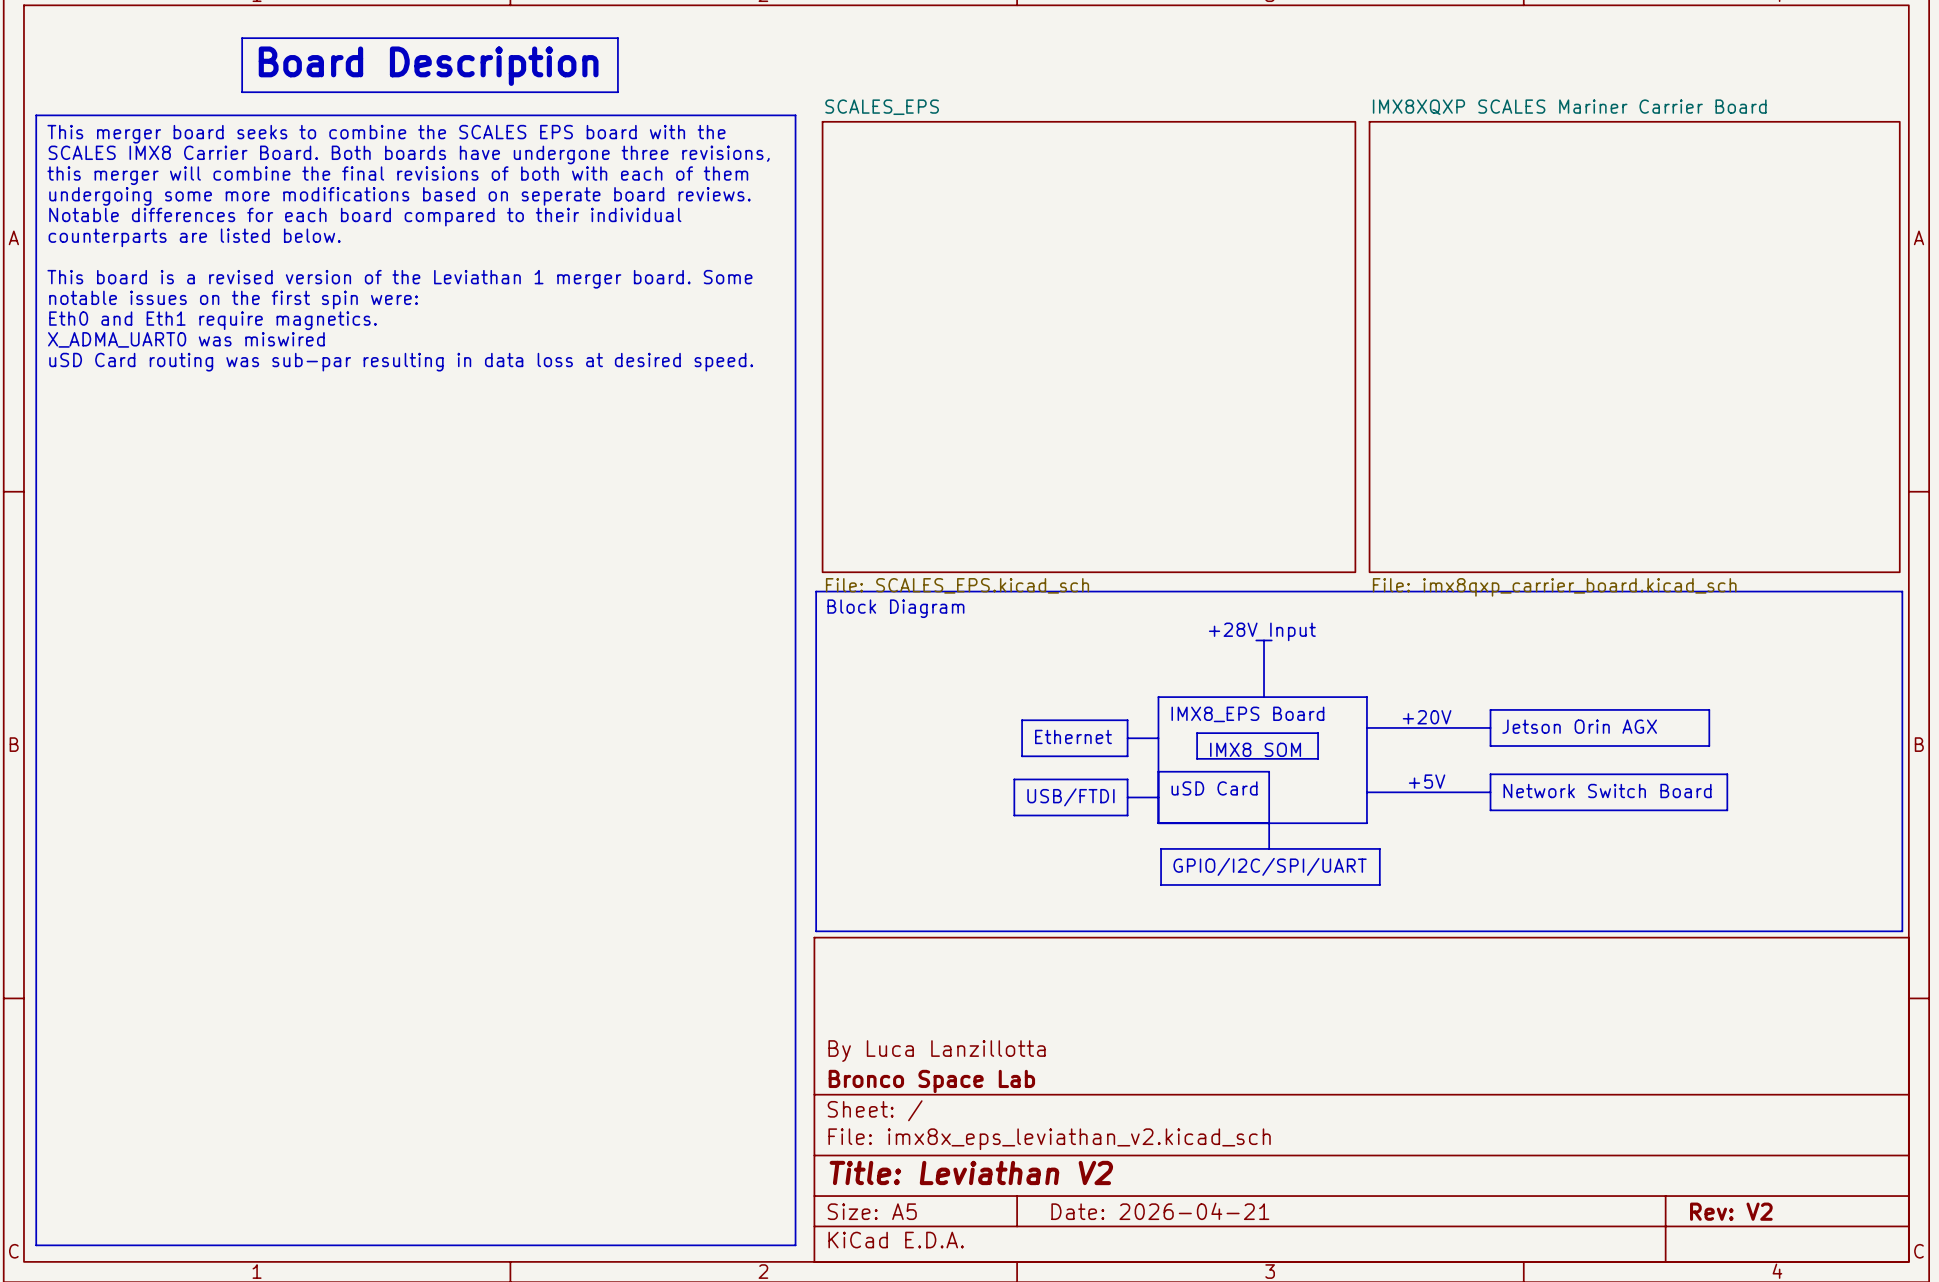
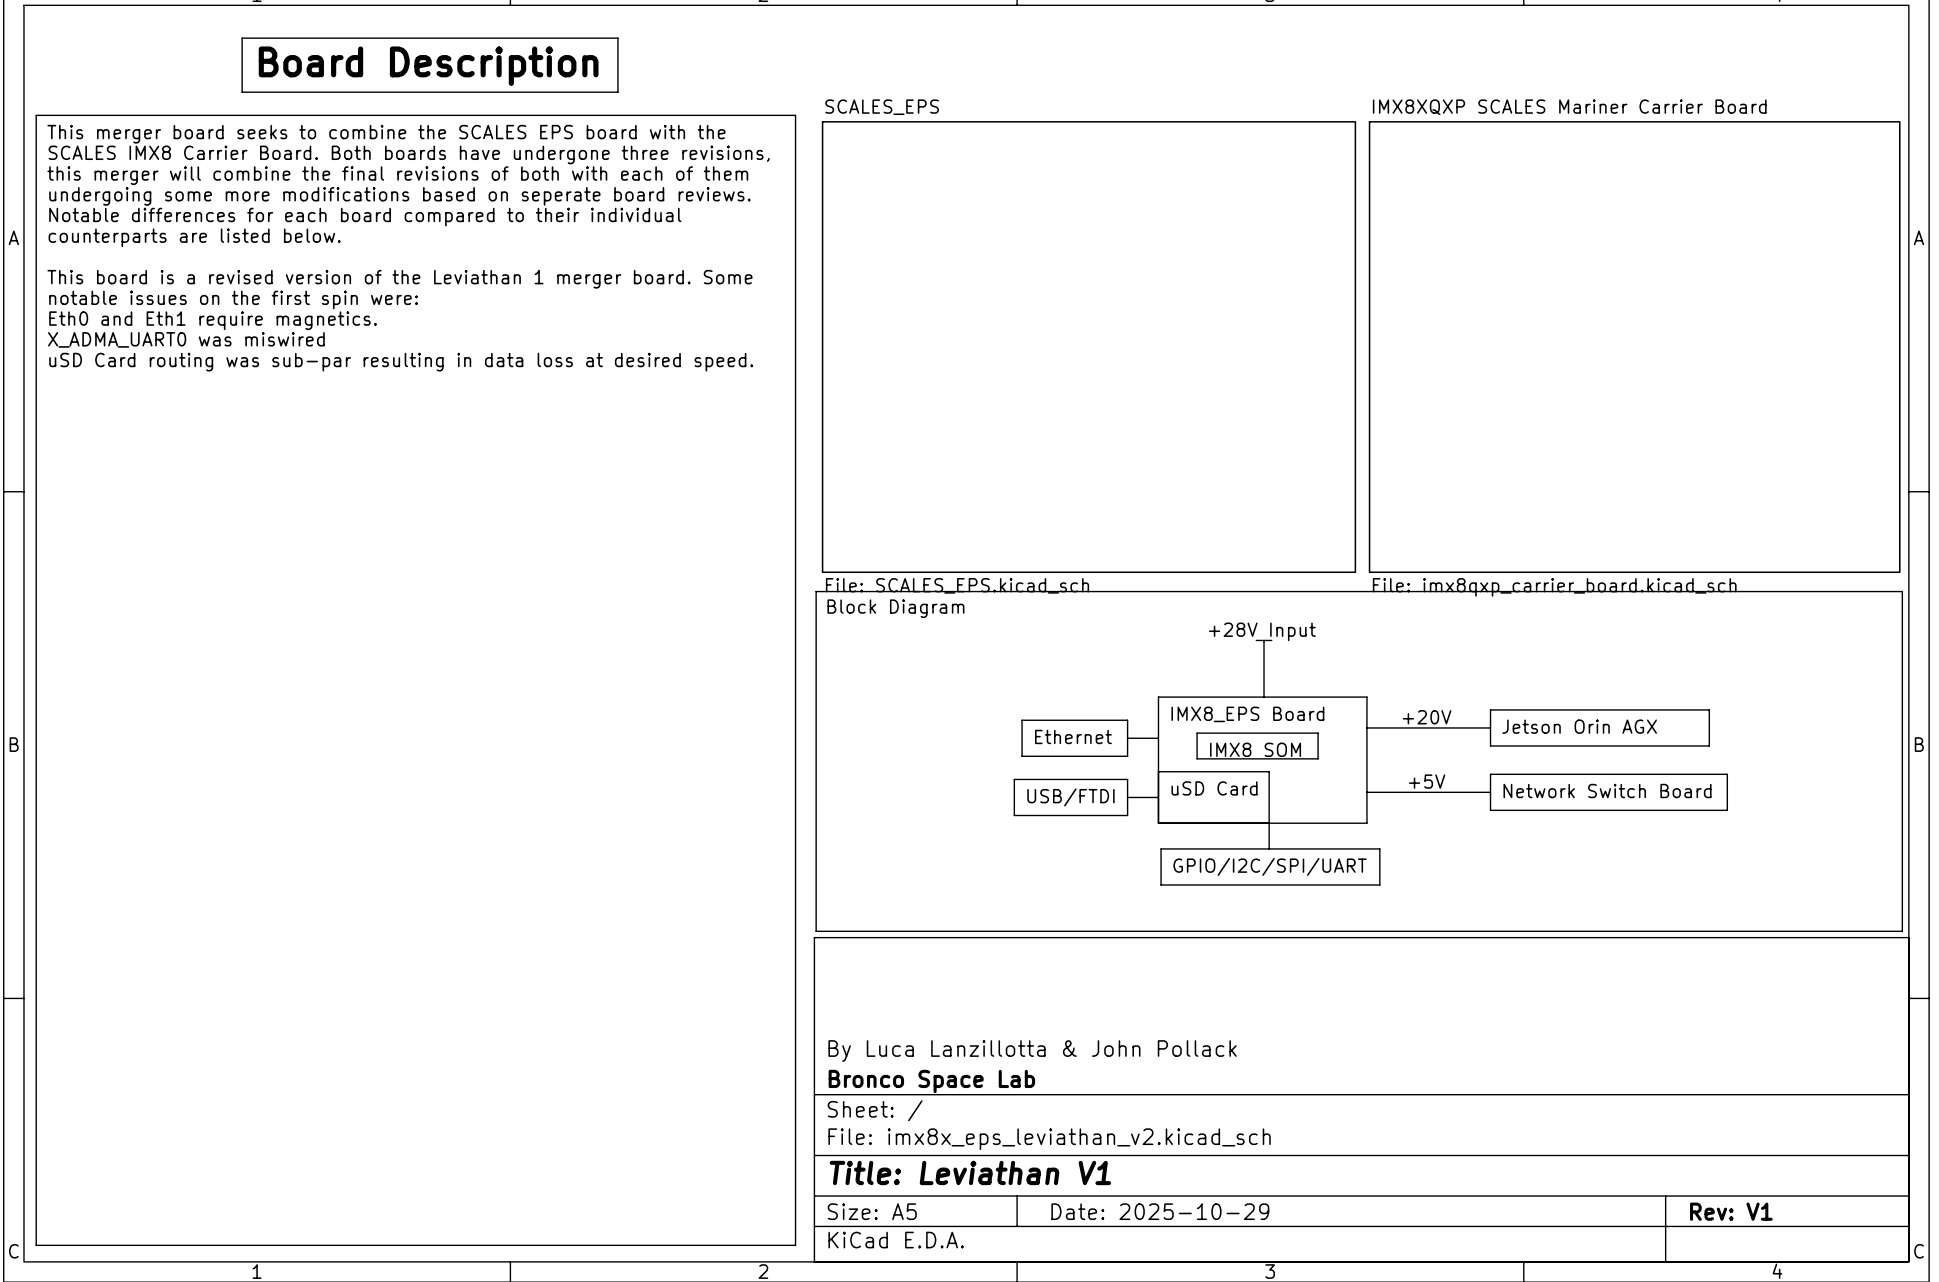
title block: By Luca Lanzillotta (937, 1051) -> By Luca Lanzillotta & John Pollack (1032, 1051)
title block: Title: Leviathan V2 (971, 1172) -> Title: Leviathan V1 (970, 1172)
title block: Date: 2026-04-21 (1160, 1211) -> Date: 2025-10-29 (1160, 1211)
title block: Rev: V2 (1731, 1211) -> Rev: V1 (1731, 1211)

